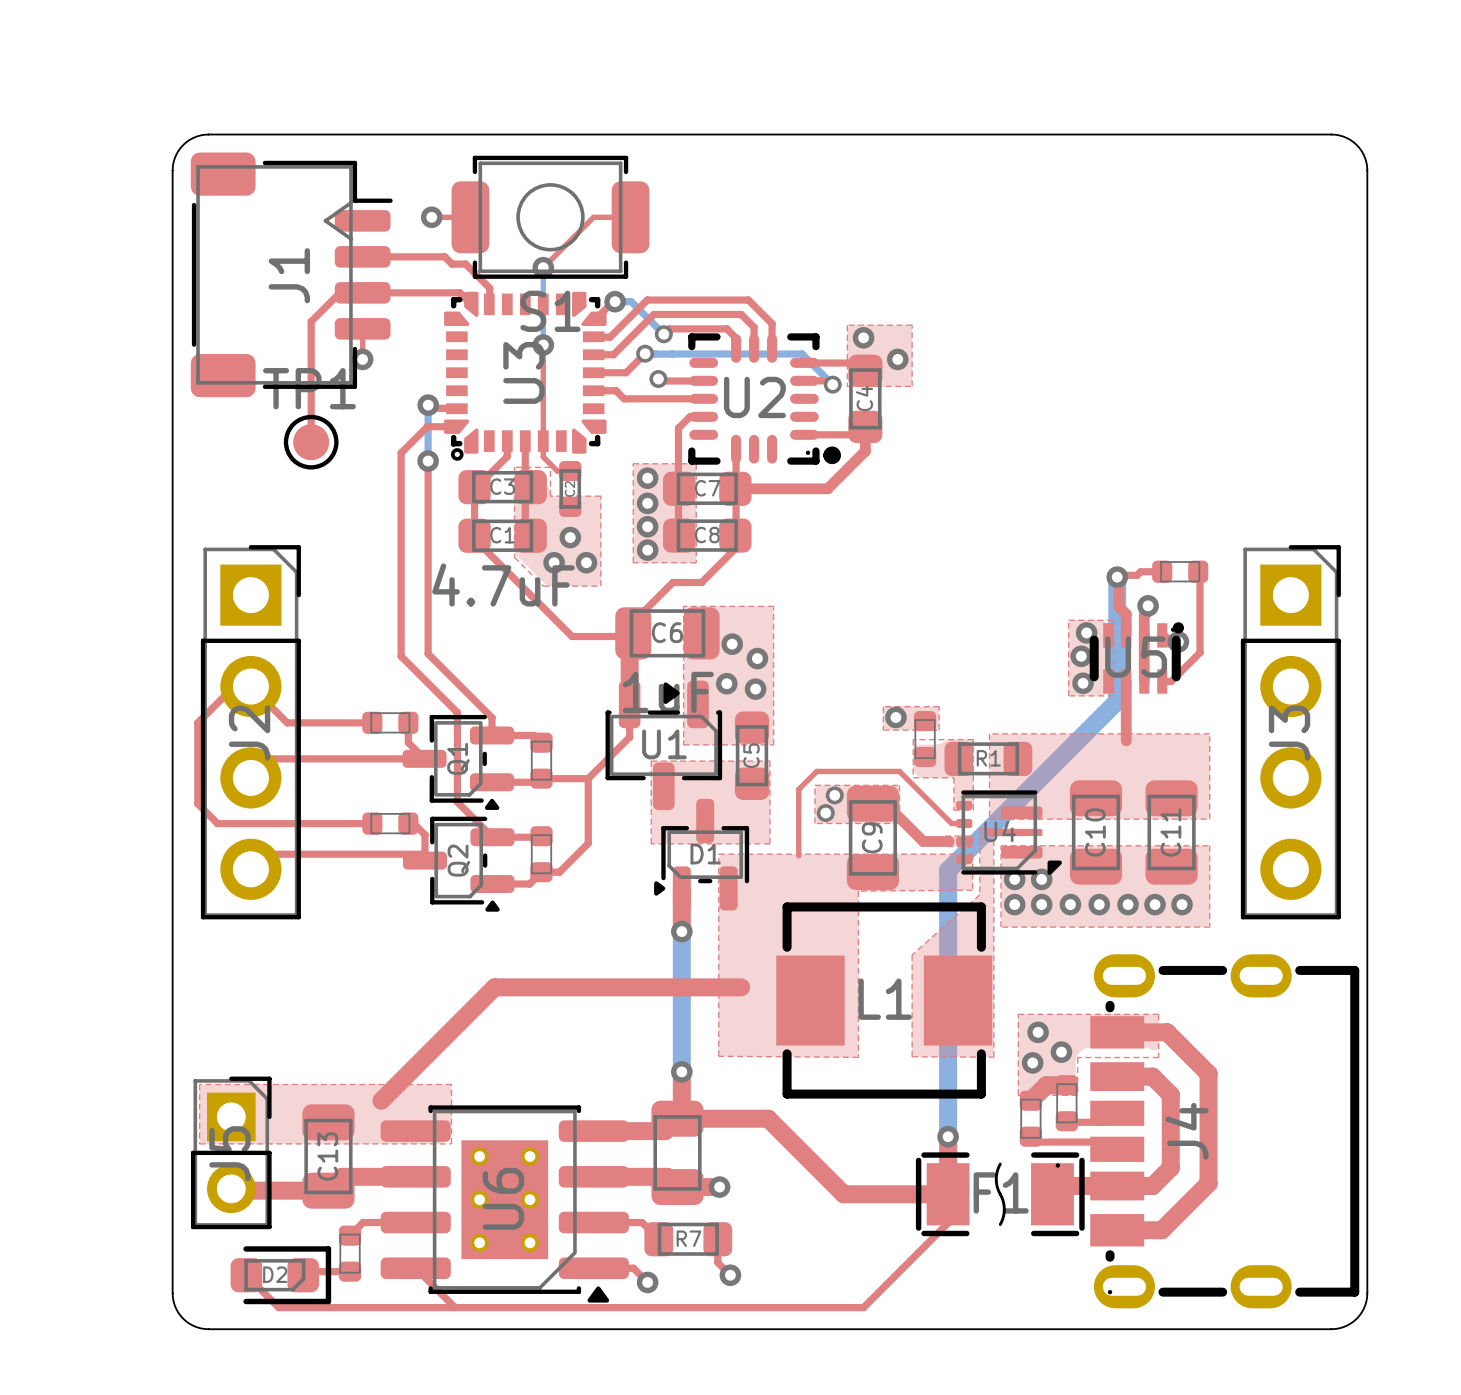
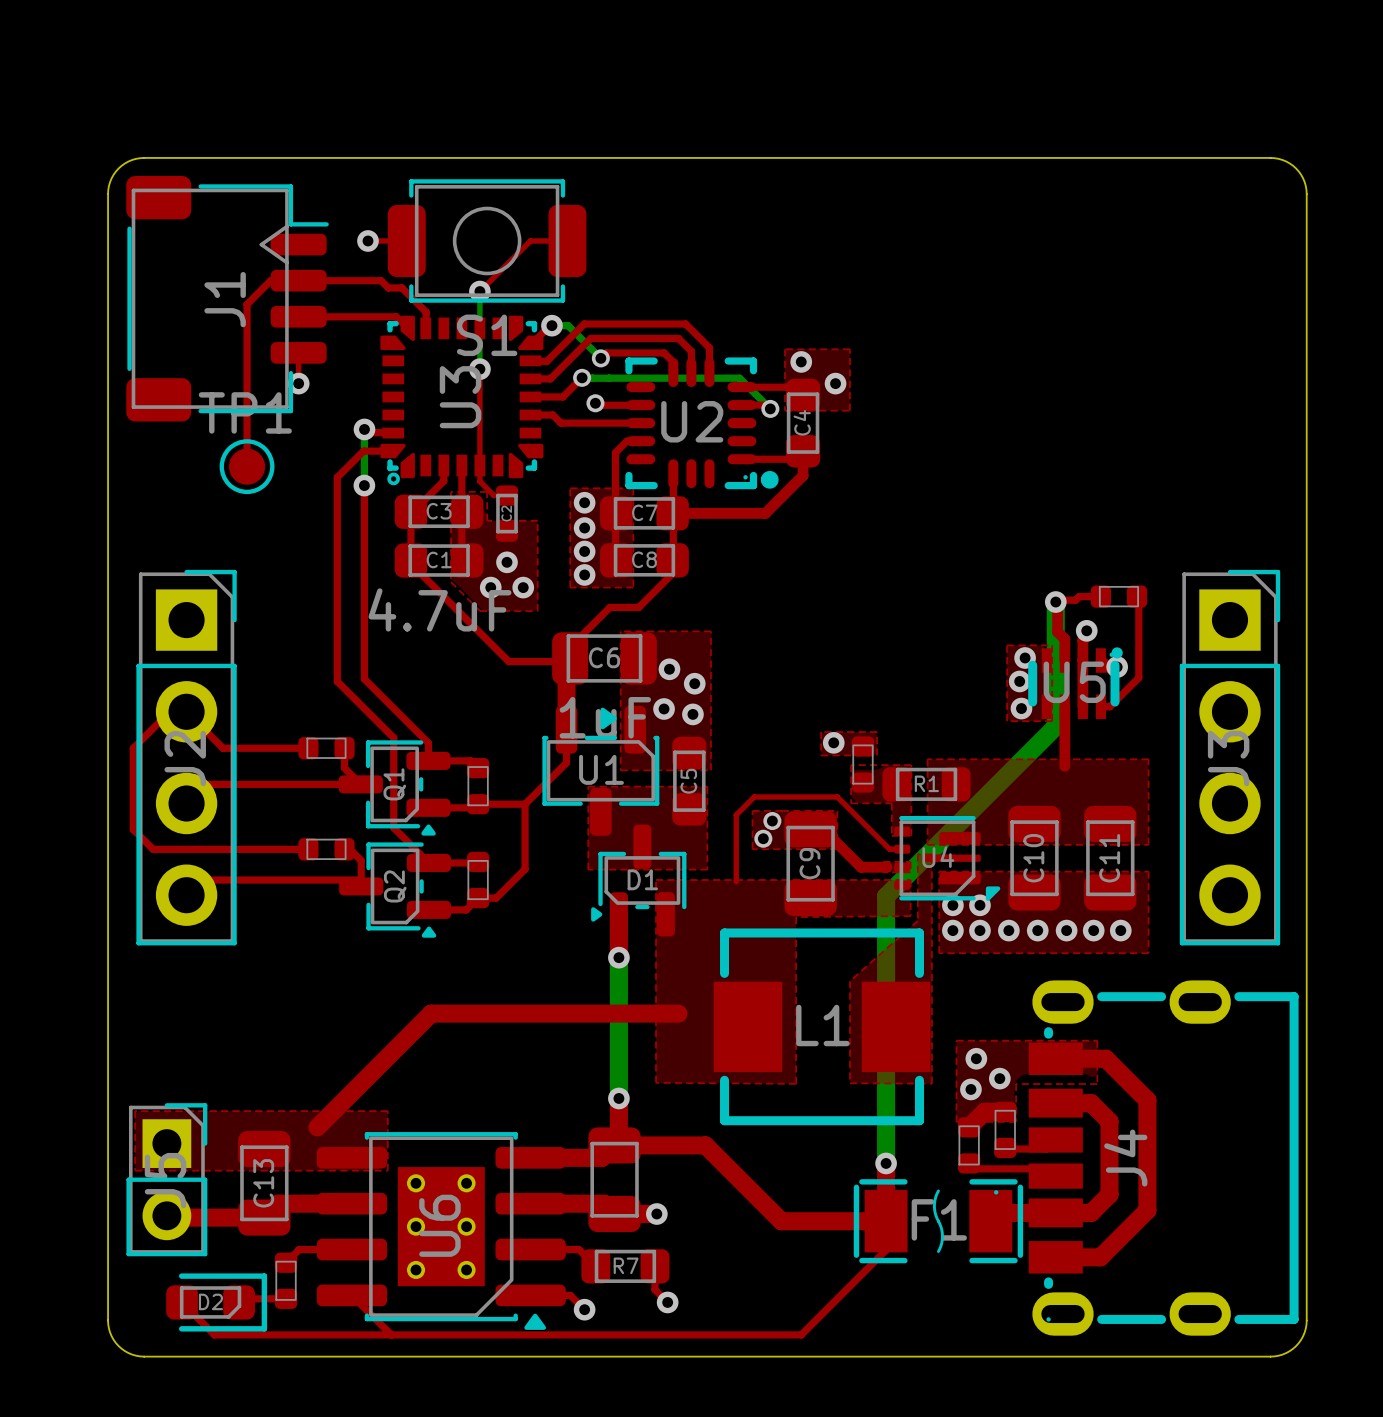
top track: (362, 292) (339, 292) (311, 321) -> (298, 280) (270, 280) (247, 304) (247, 345)

